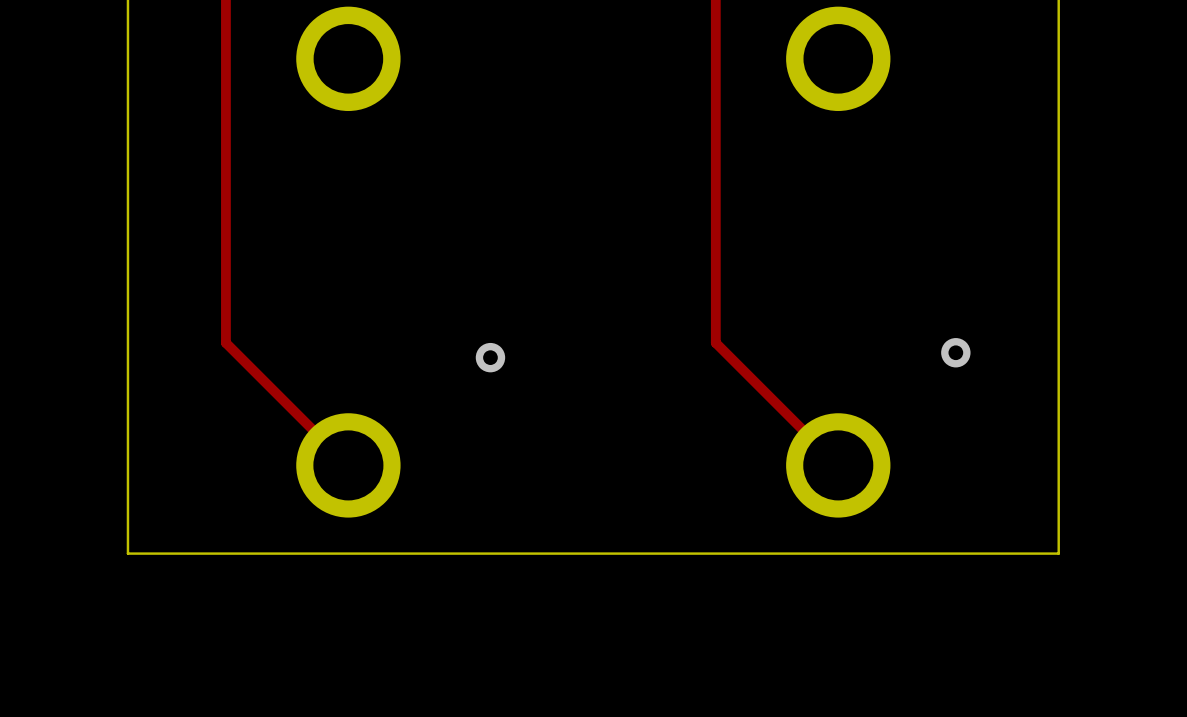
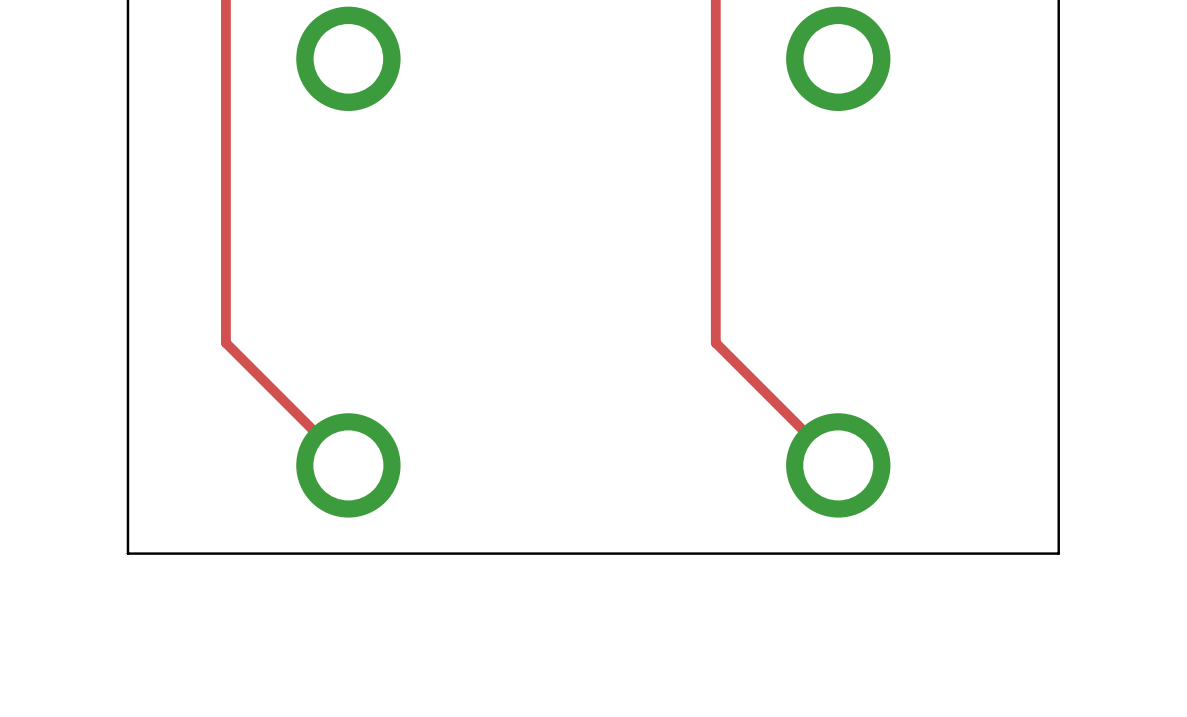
via: (955, 352) -> none
via: (490, 357) -> none

